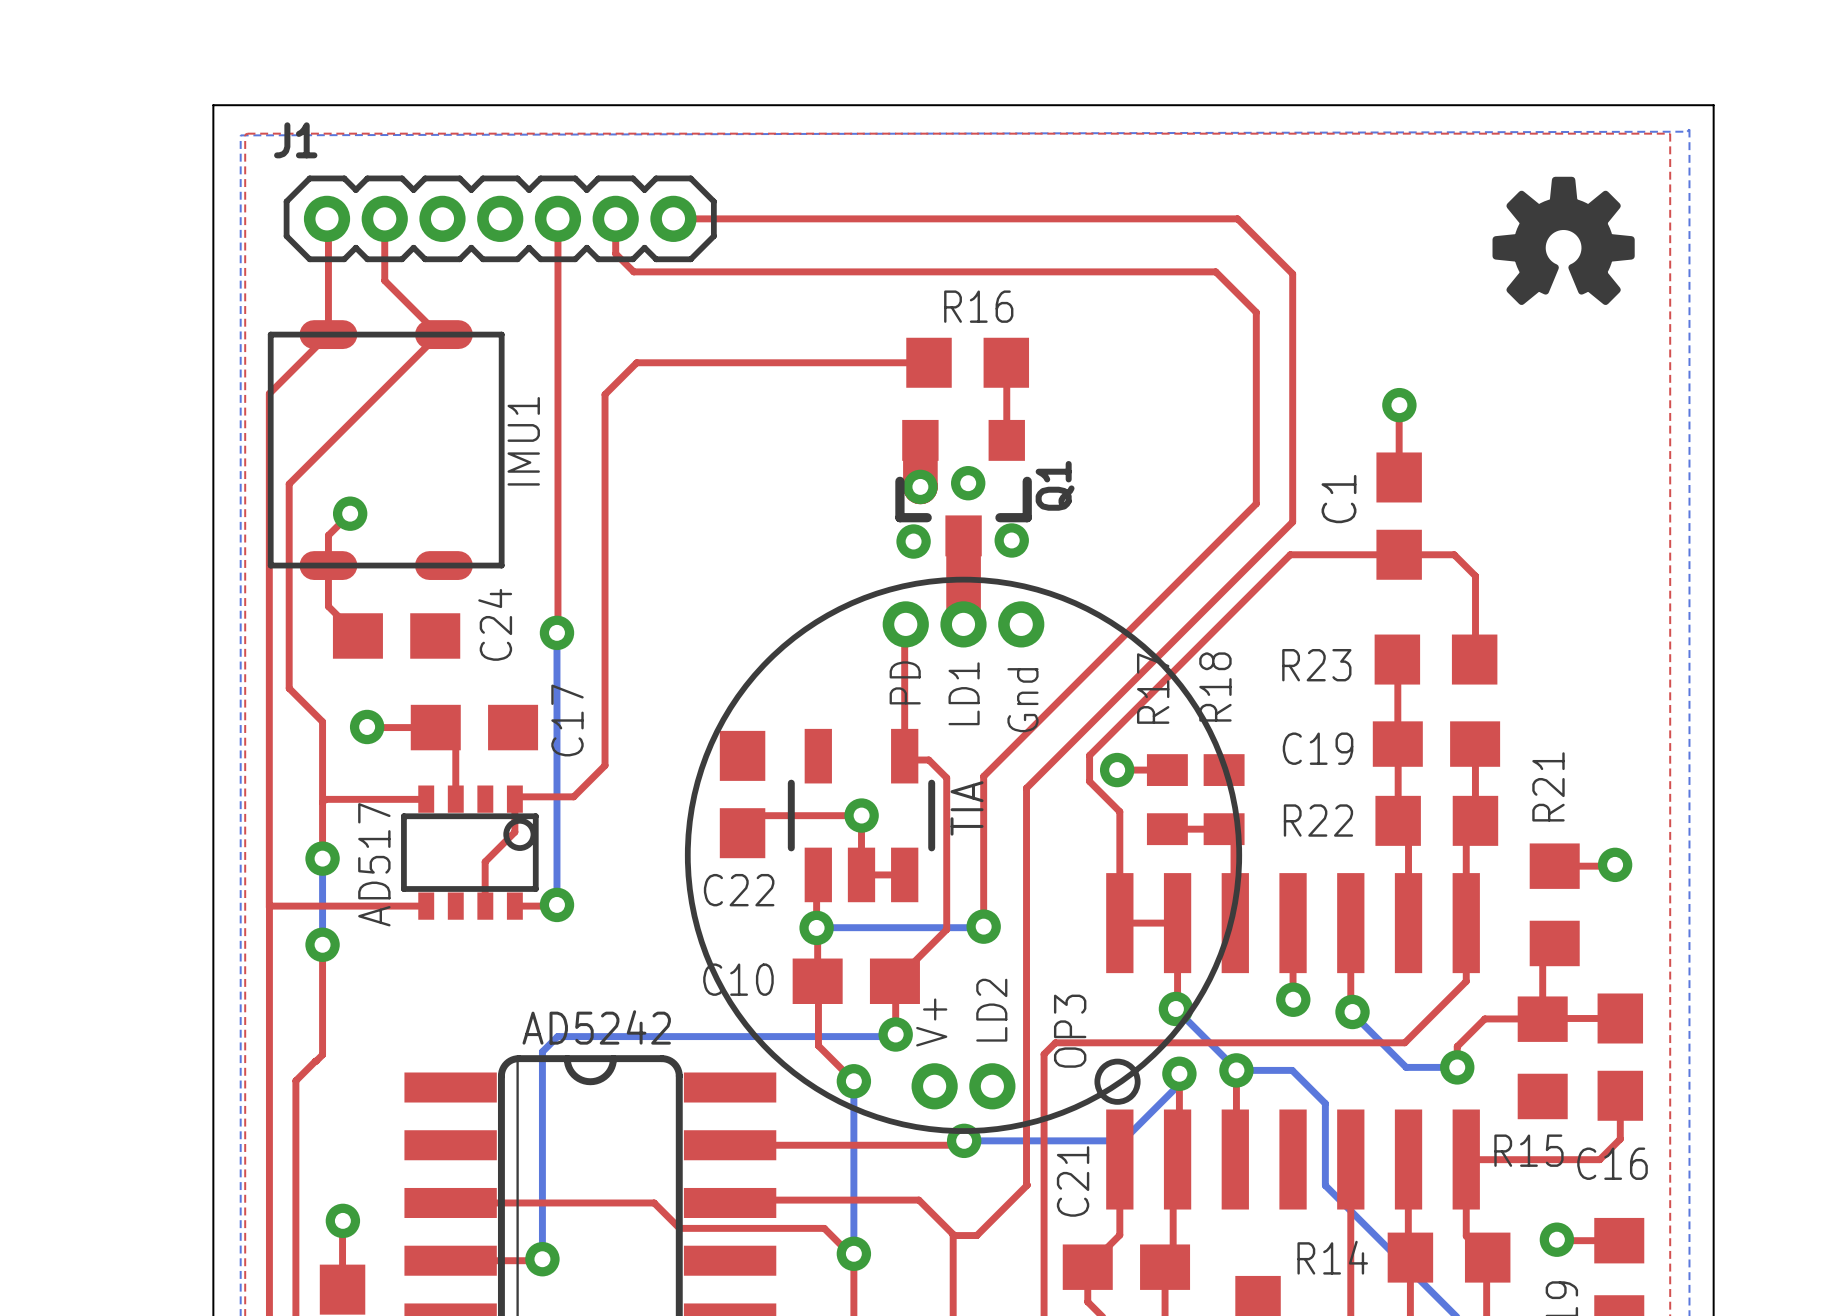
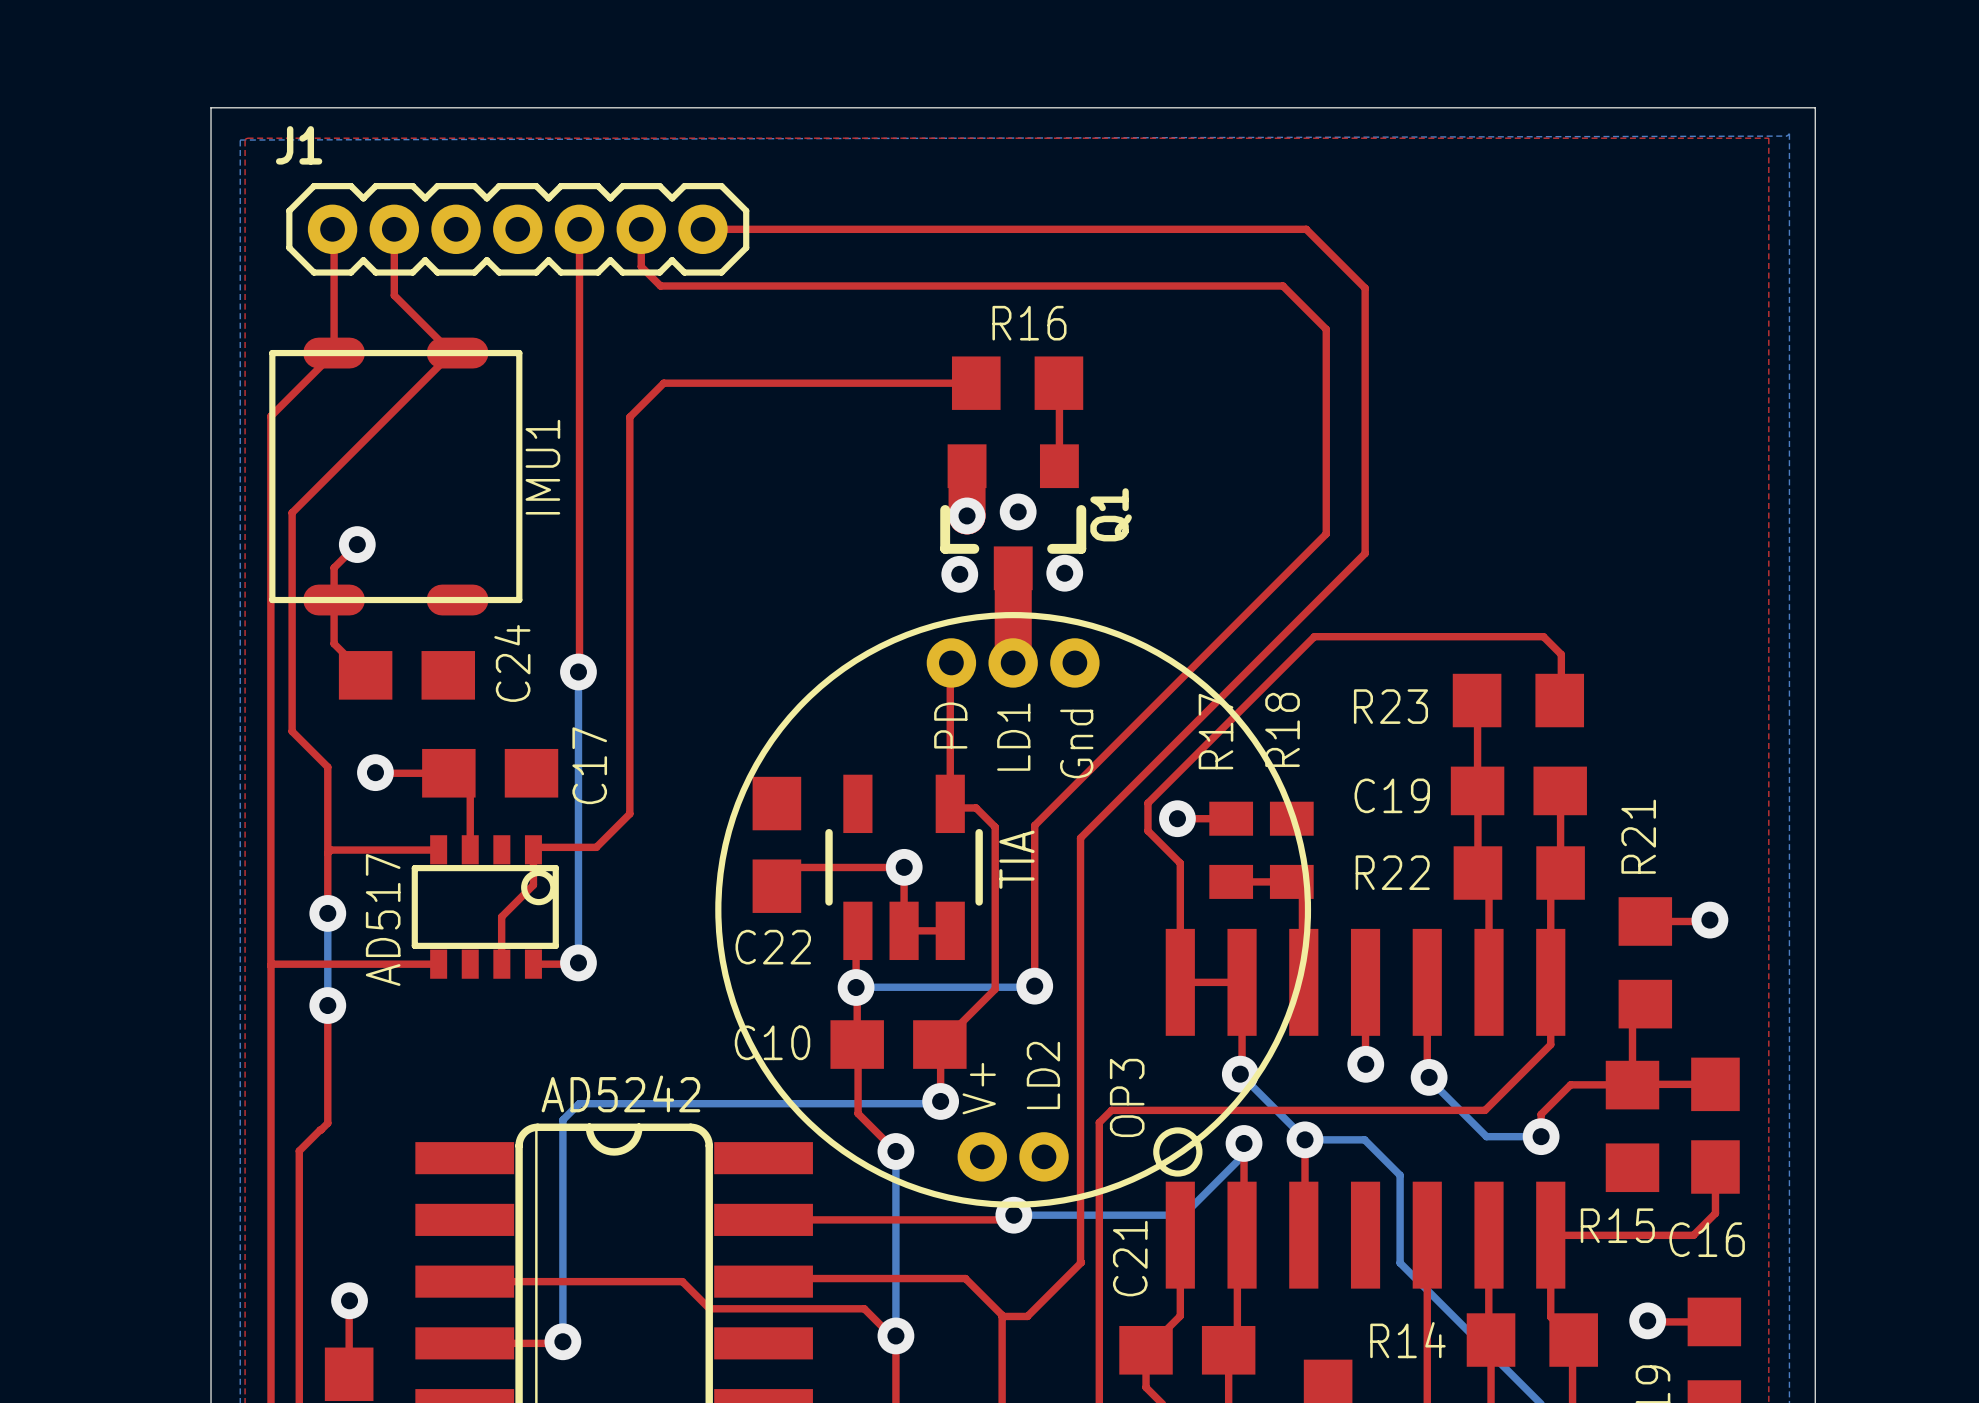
drawing: [1492, 176, 1635, 306] -> none
top track: (1399, 405) (1399, 477) -> none
via: (1399, 405) -> none
C1: (1399, 516) -> none
top track: (1245, 599) (1290, 554) (1454, 554) (1475, 576) (1475, 658) -> (1314, 636) (1543, 636) (1561, 654) (1561, 698)

